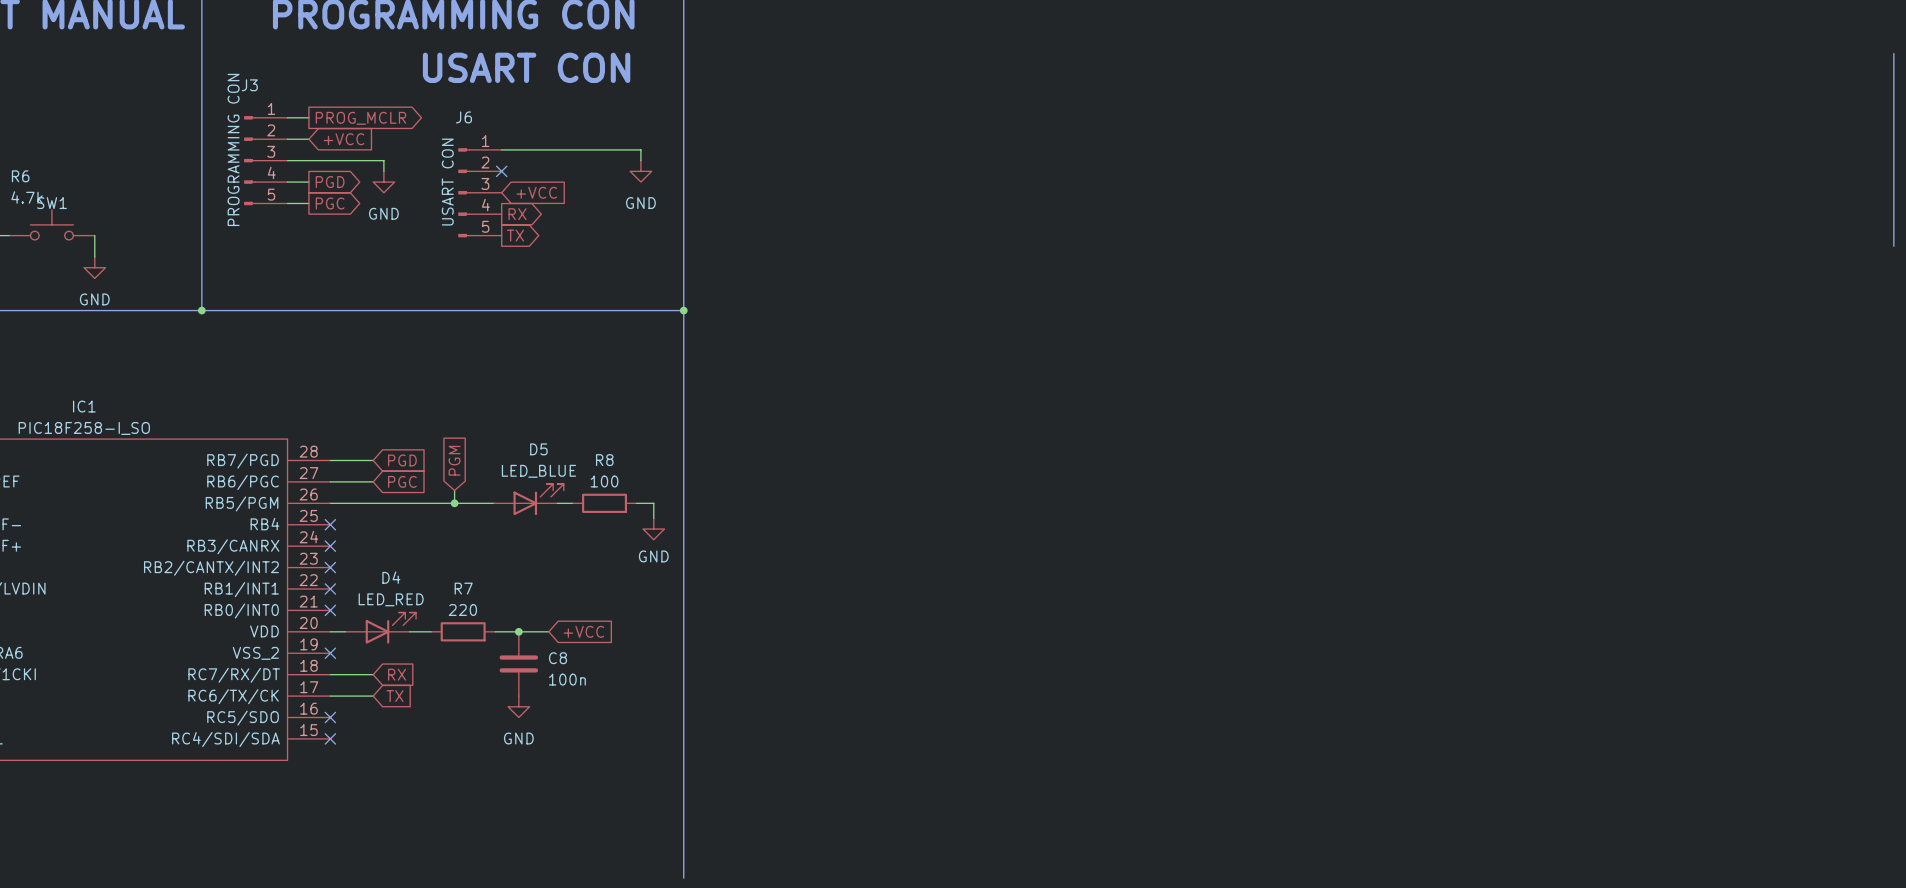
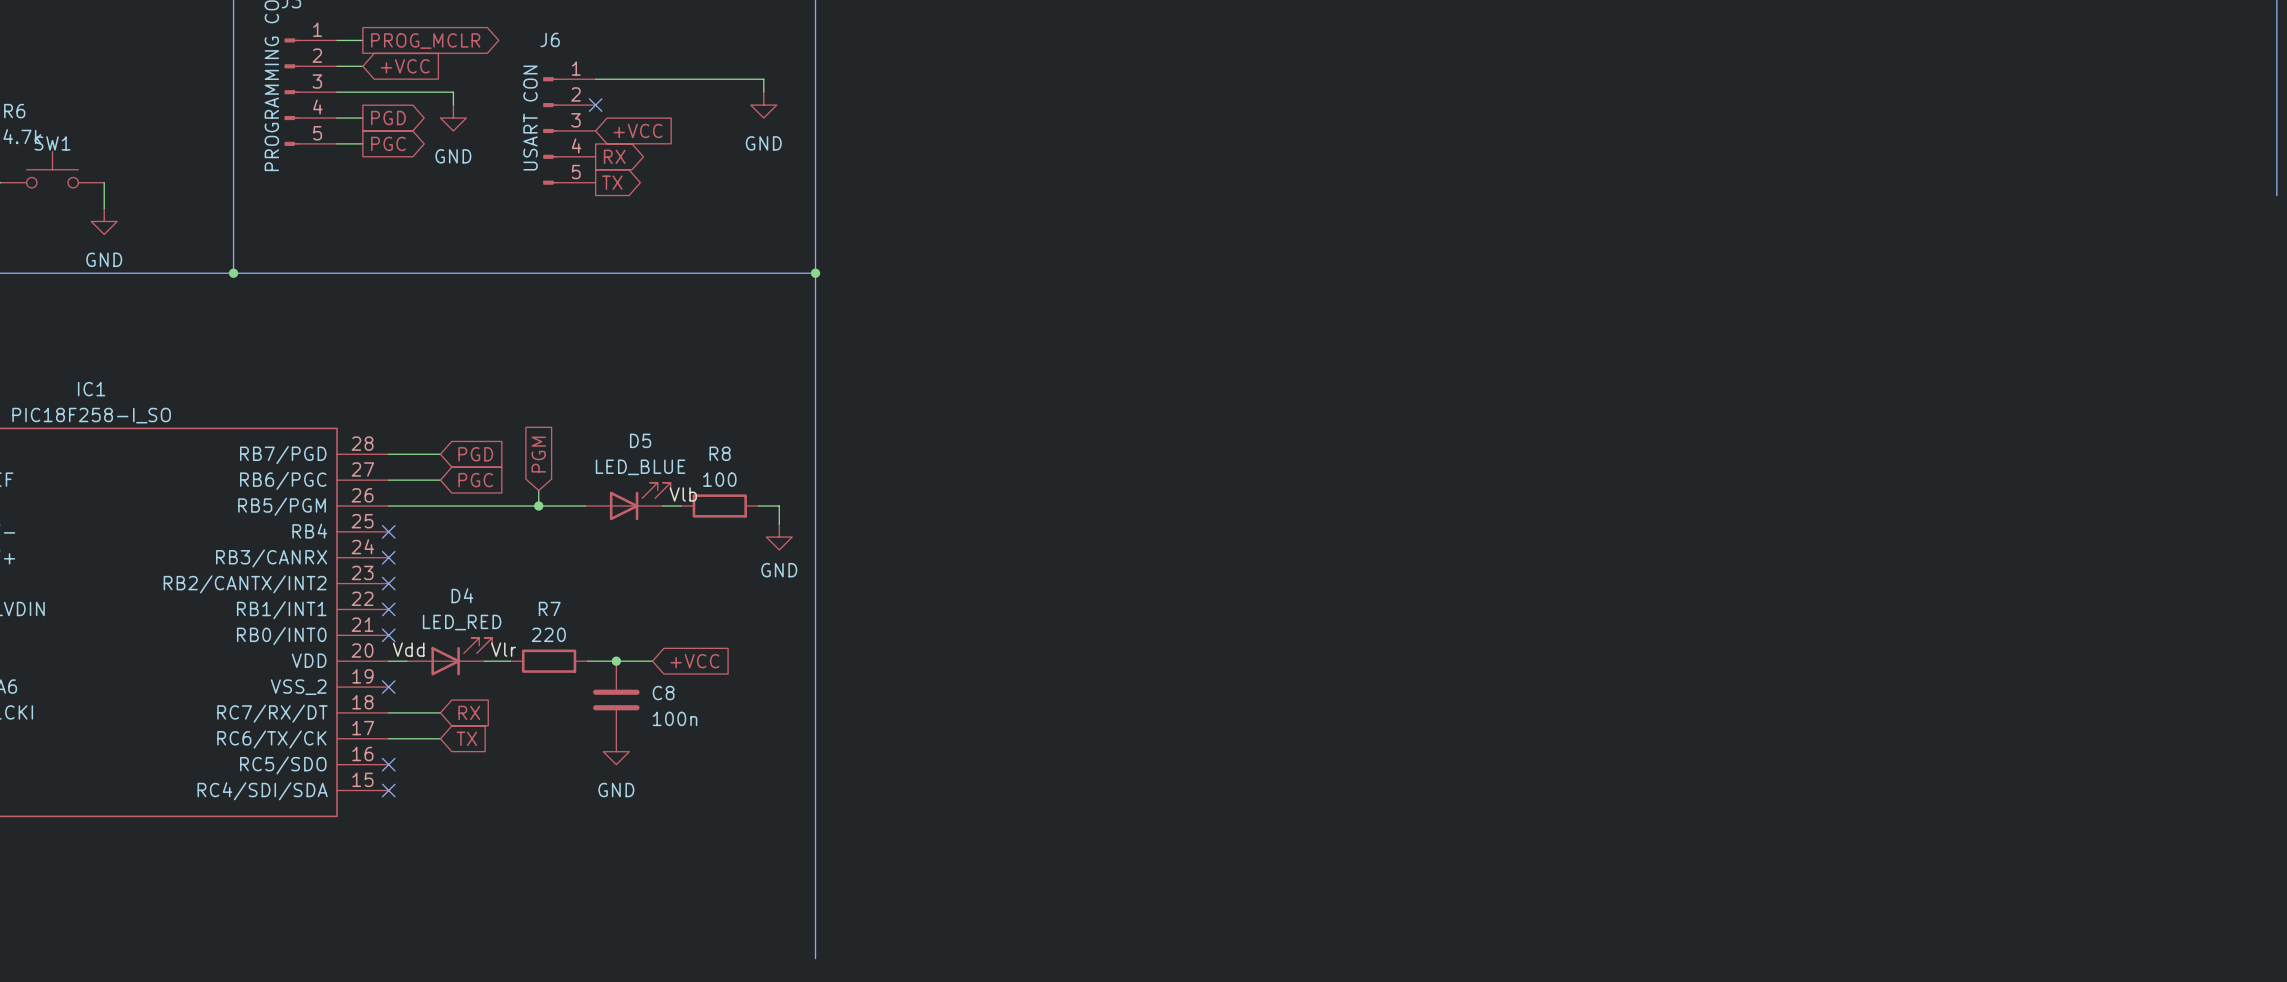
label: none -> Vlb (683, 494)
label: none -> Vdd (408, 649)
label: none -> Vlr (503, 649)

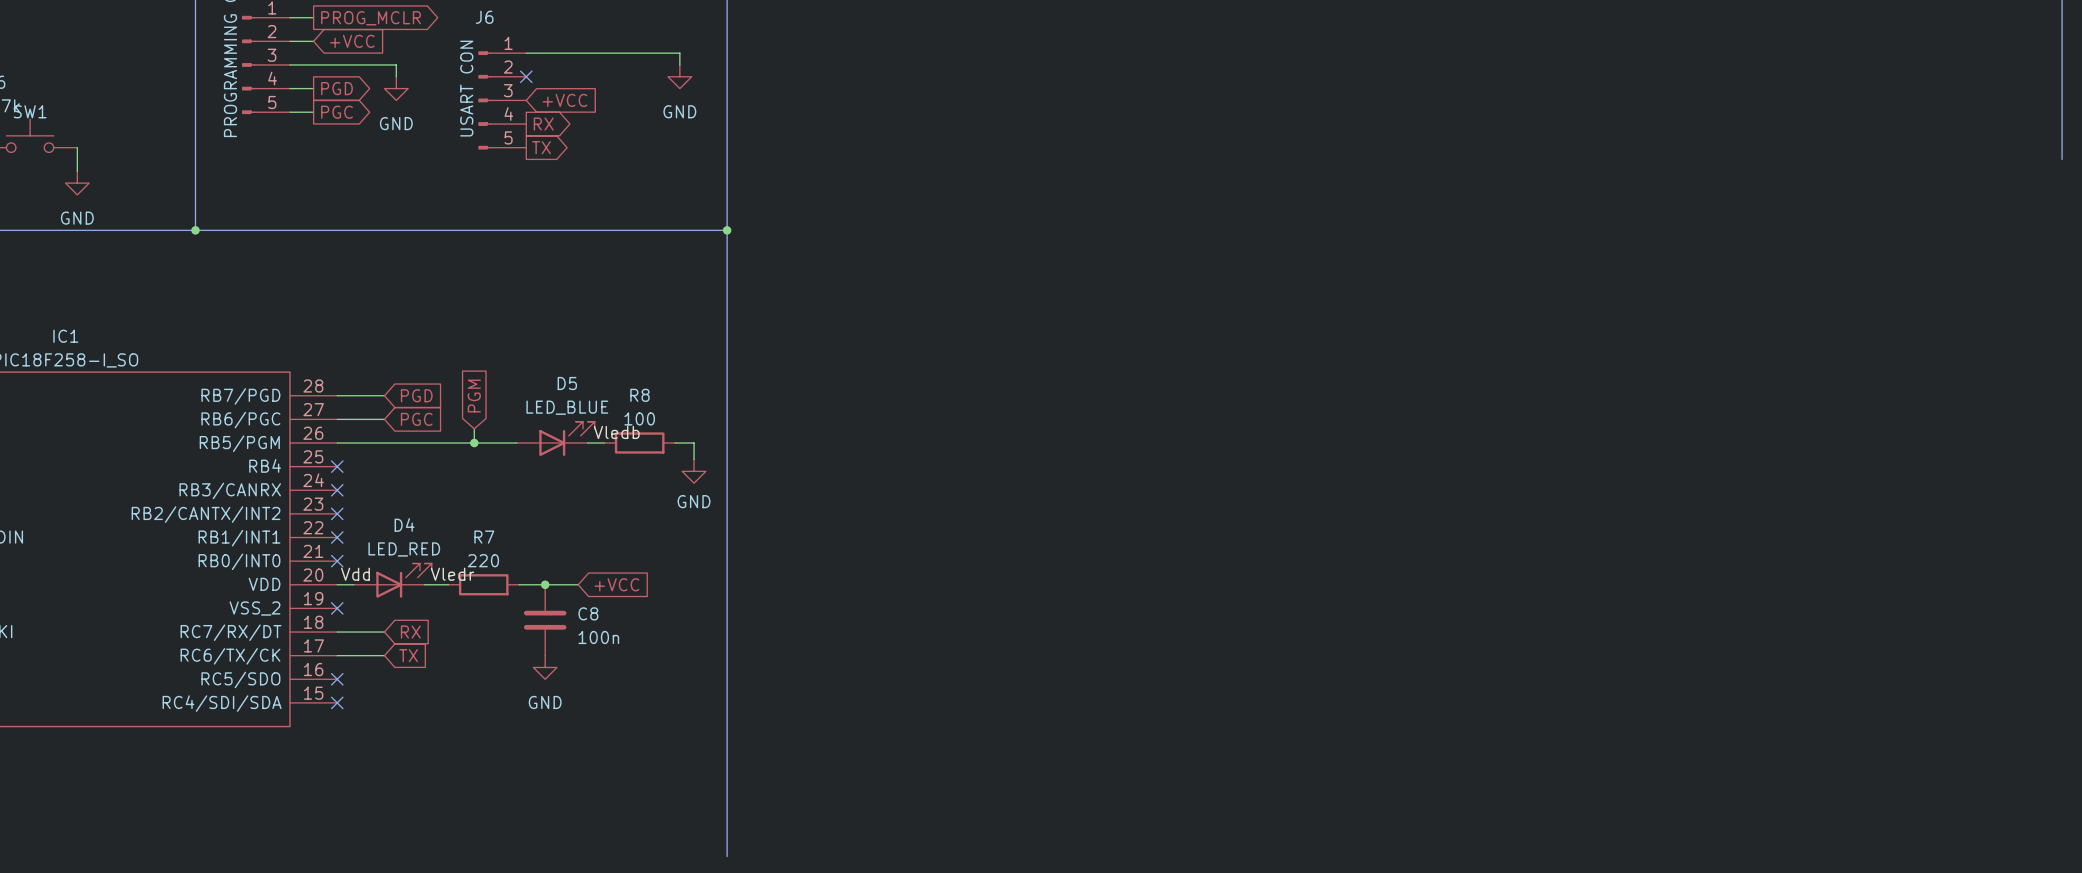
label: Vlb (683, 494) -> Vledb (616, 432)
label: Vlr (503, 649) -> Vledr (452, 574)

